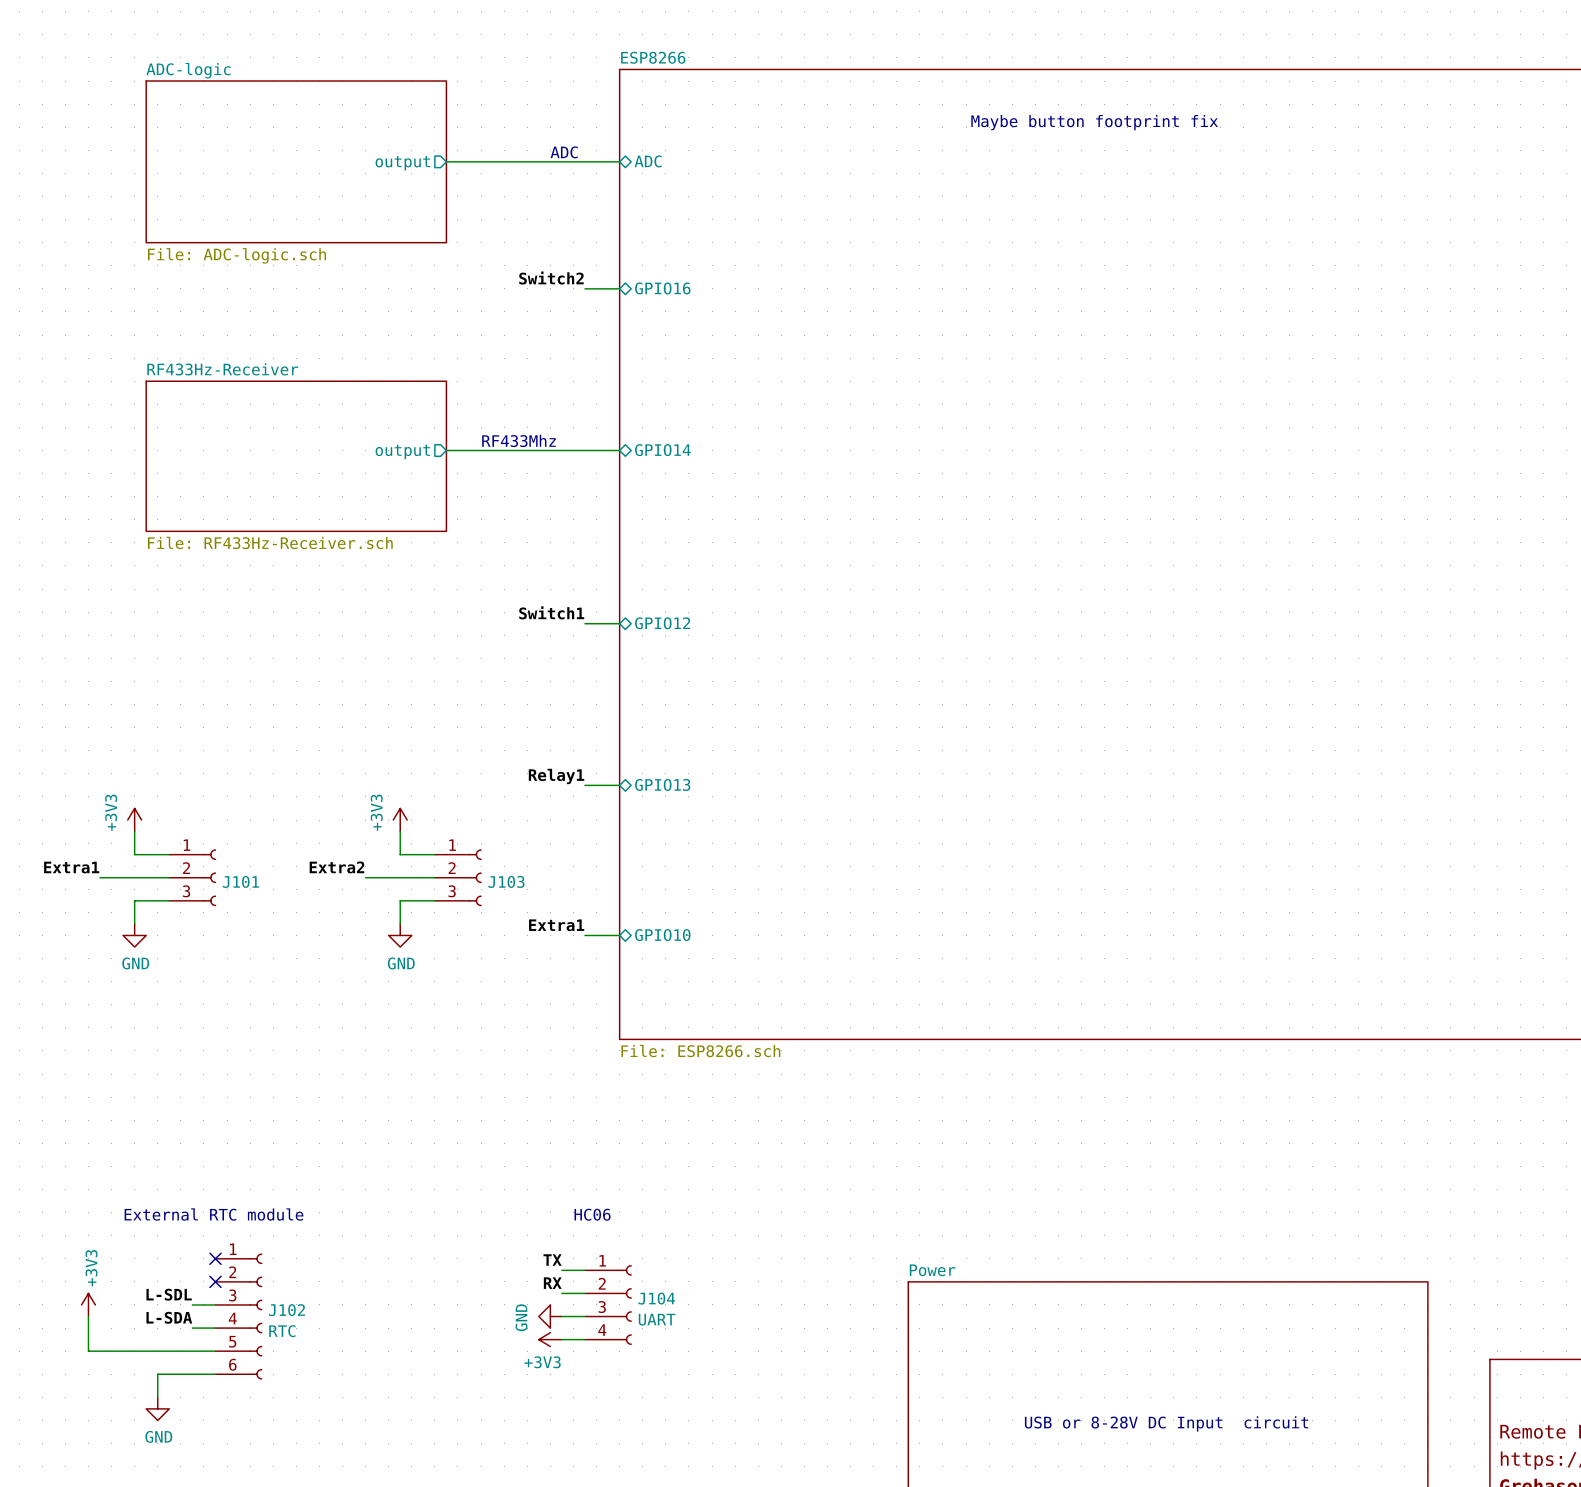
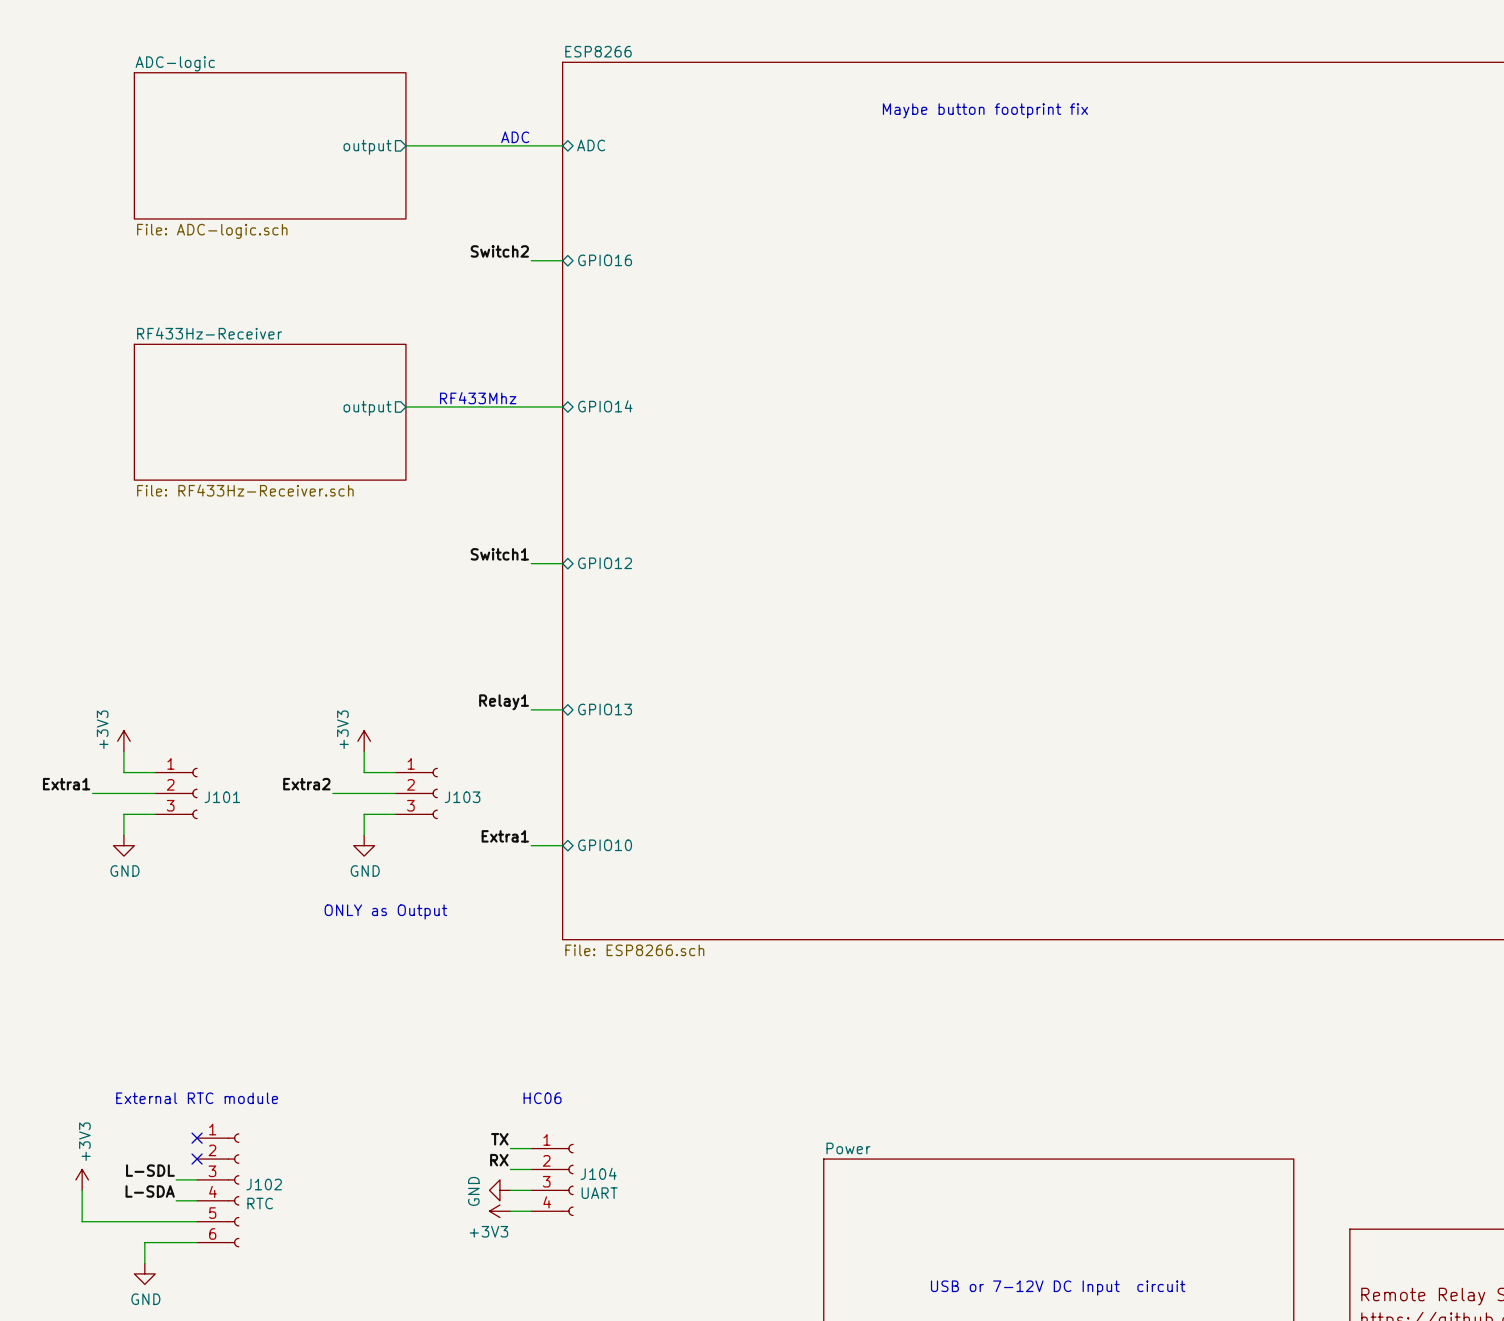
text: none -> ONLY as Output (385, 911)
text: USB or 8-28V DC Input circuit (1166, 1423) -> USB or 7-12V DC Input circuit (1058, 1288)

